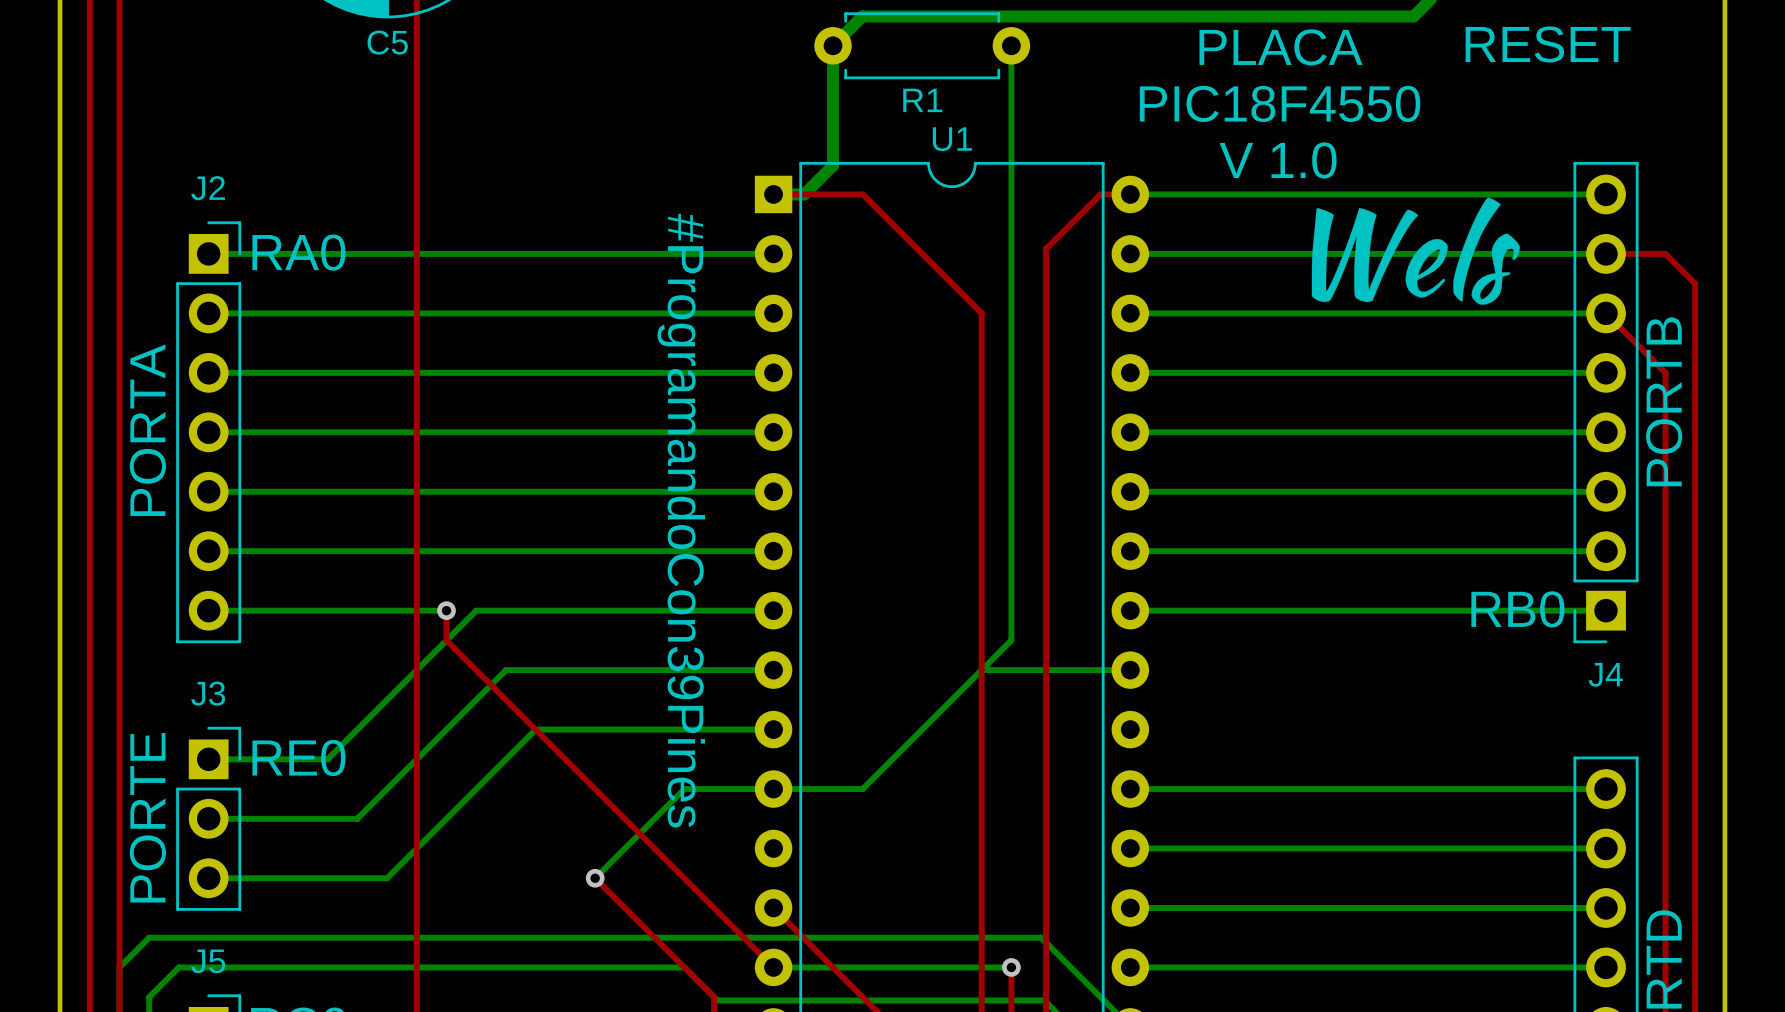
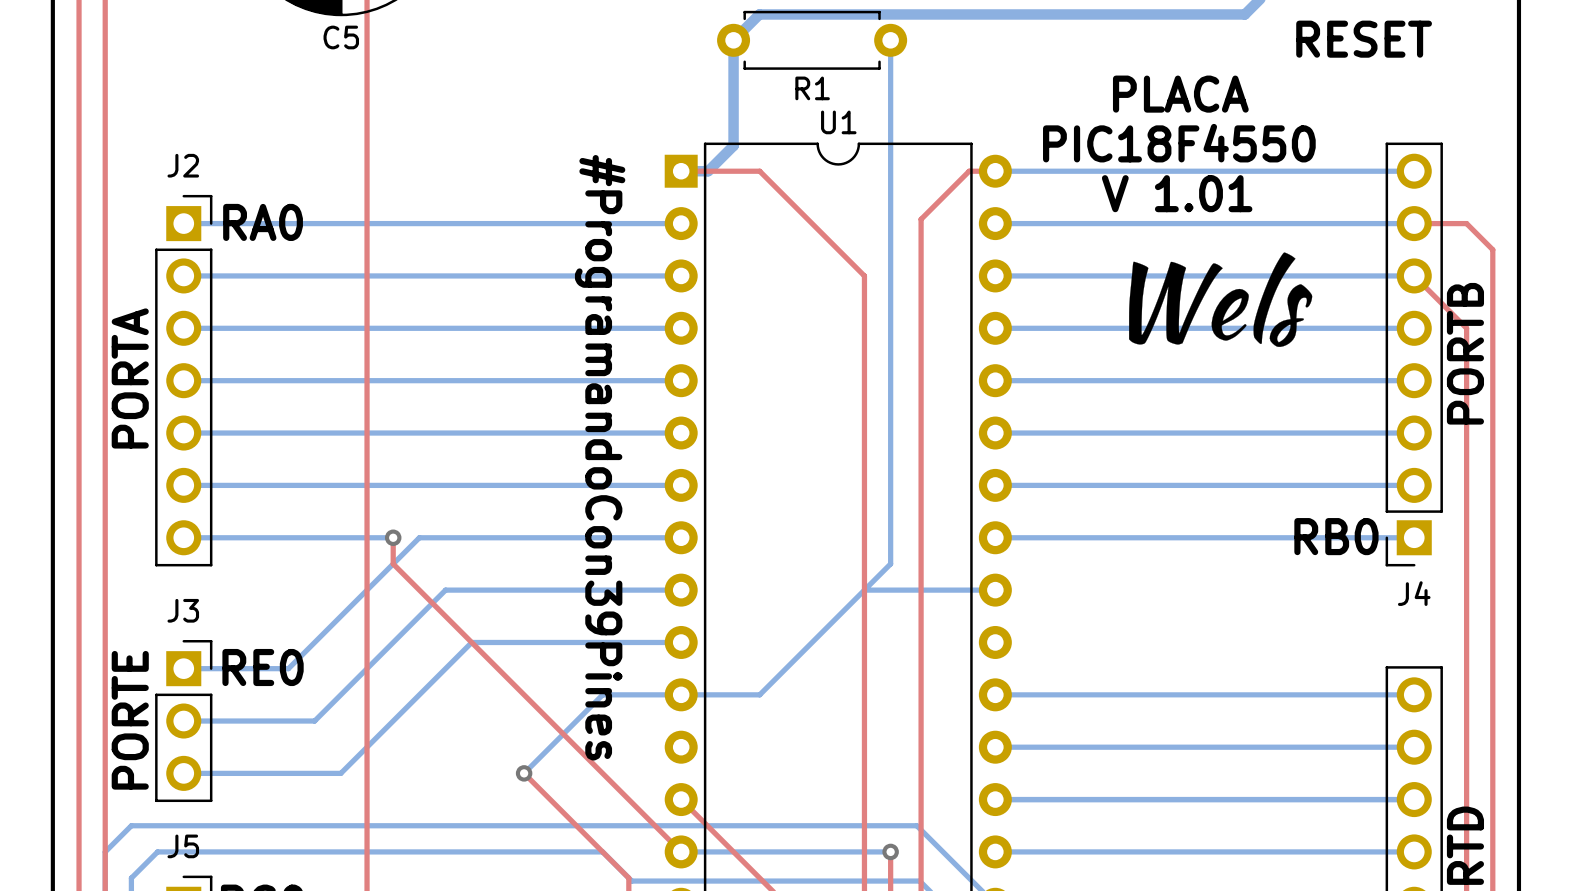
text position: PLACA (1281, 47) -> PLACA (1180, 94)
text position: PIC18F4550 (1280, 103) -> PIC18F4550 (1179, 143)
text: V 1.0 (1278, 160) -> V 1.01 (1177, 193)
drawing position: (1415, 251) -> (1220, 299)

